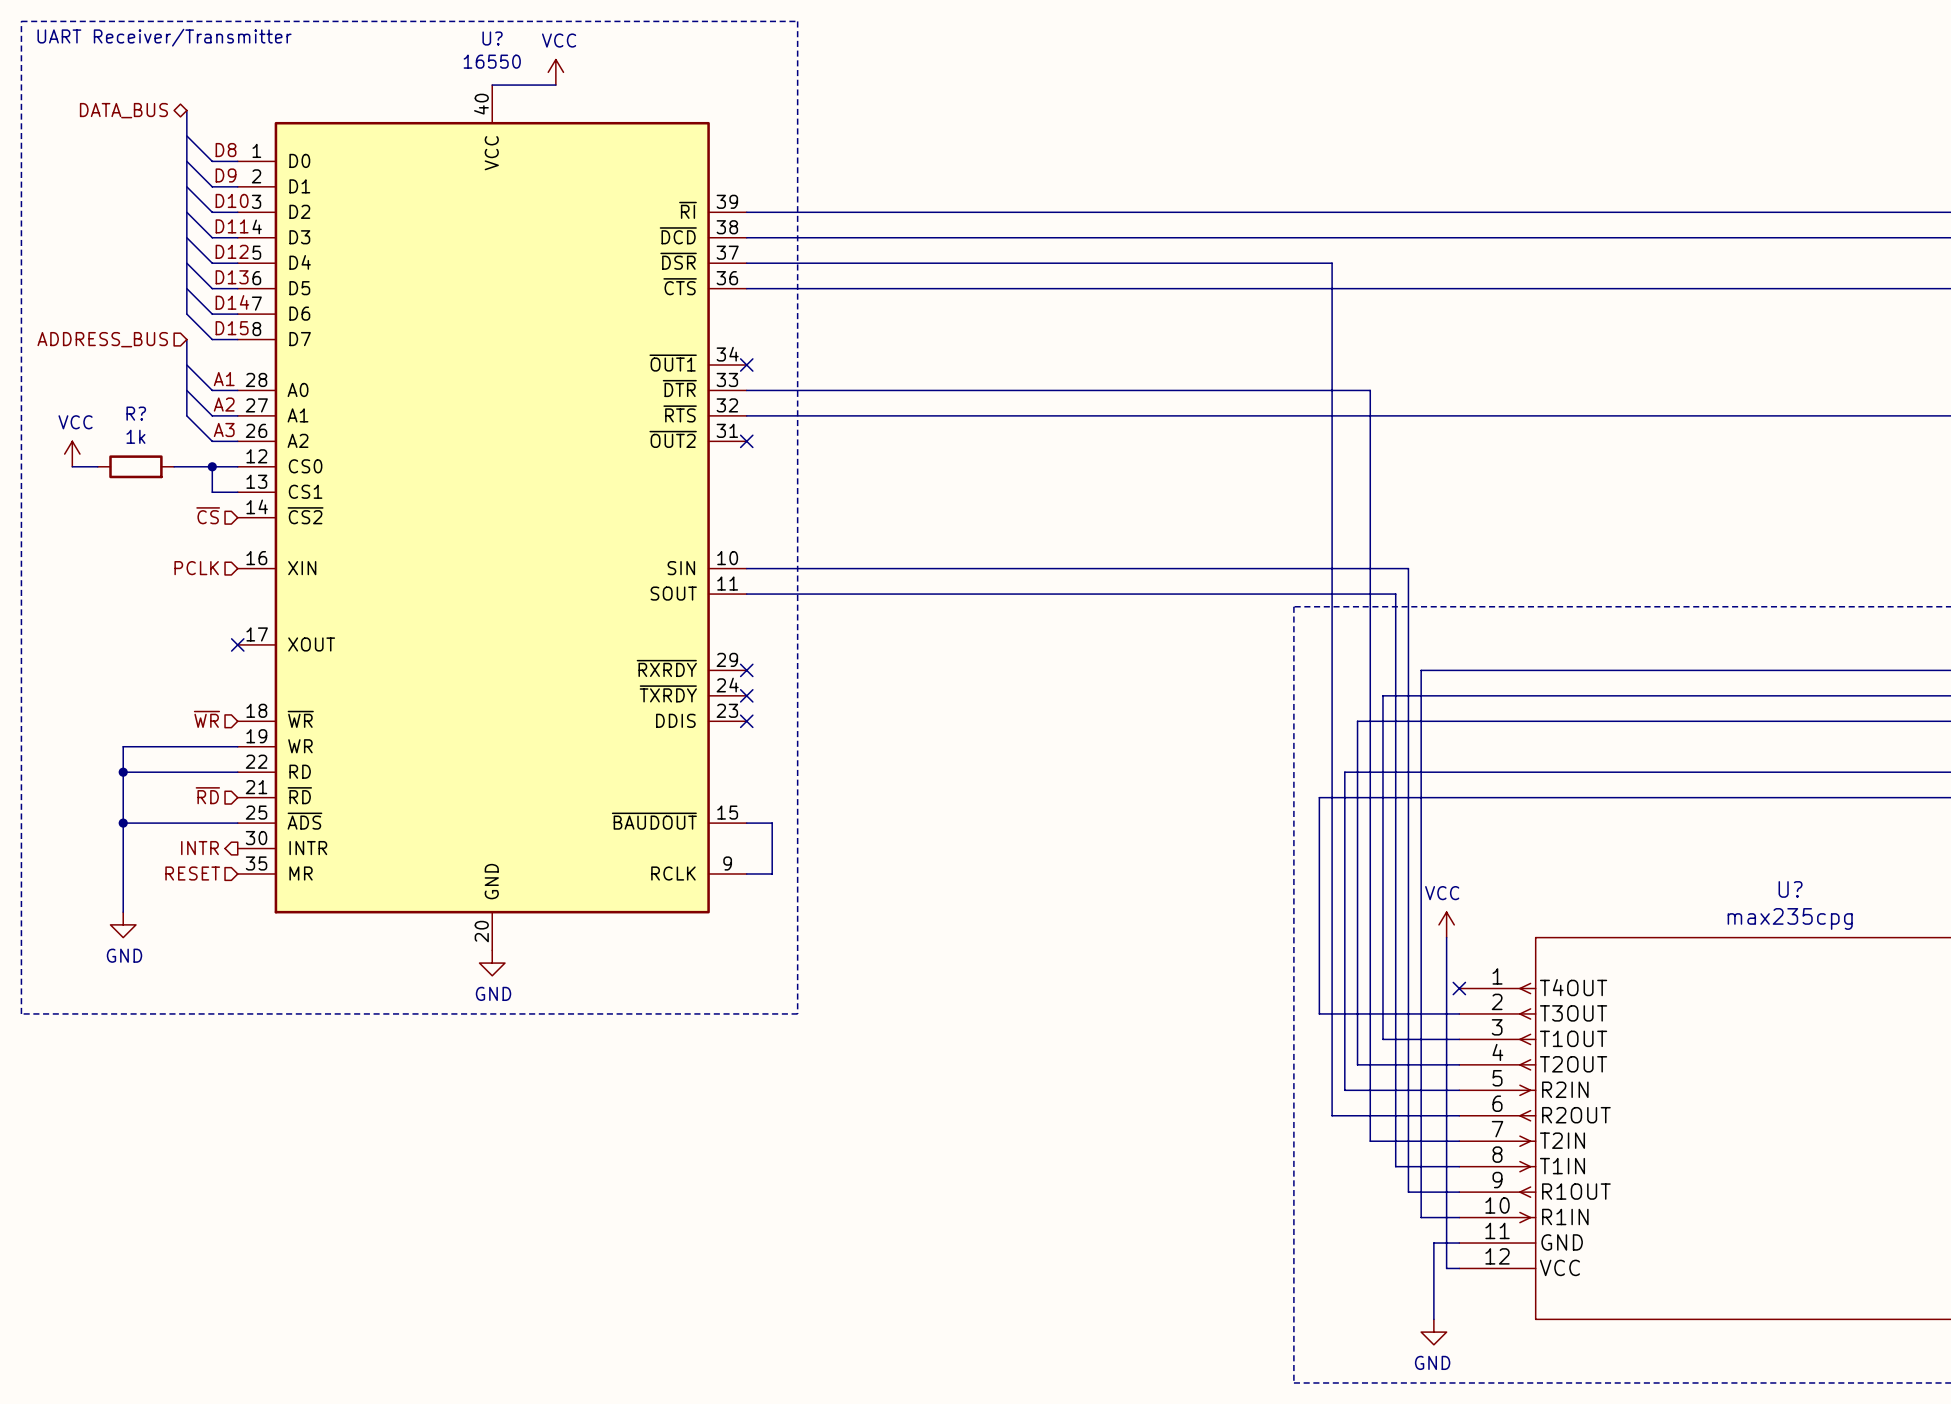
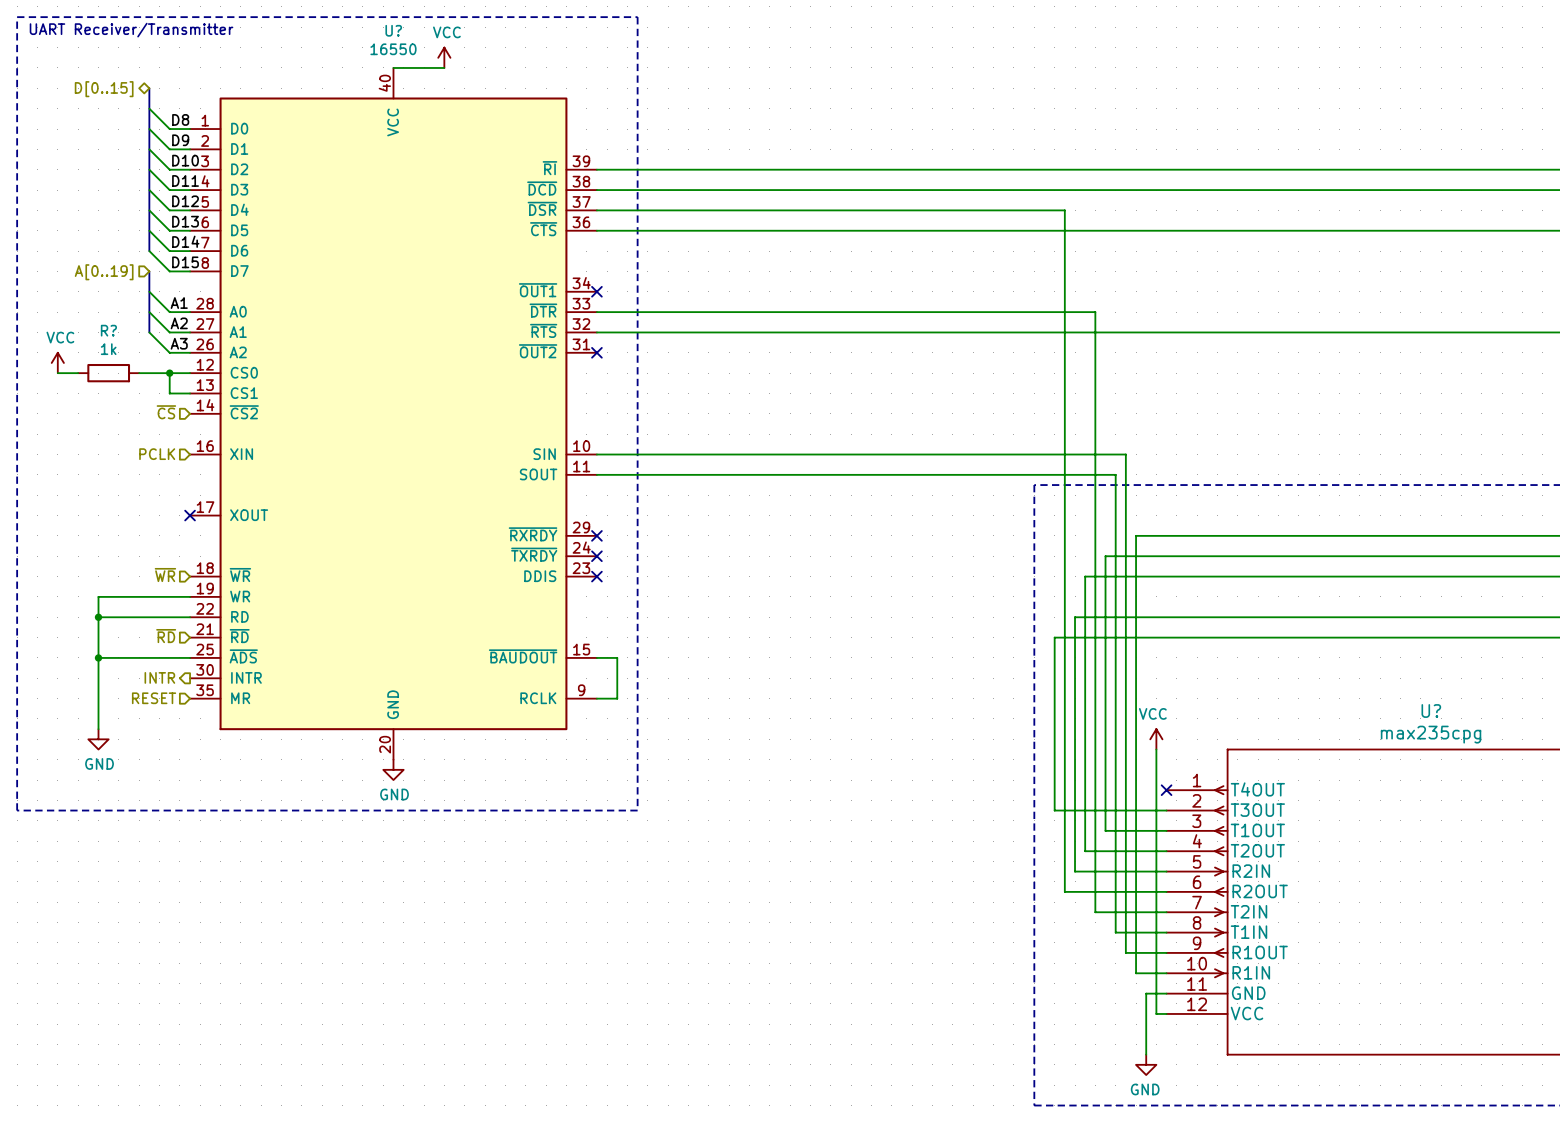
hierarchical label: DATA_BUS (123, 110) -> D[0..15] (104, 89)
hierarchical label: ADDRESS_BUS (102, 339) -> A[0..19] (104, 272)

